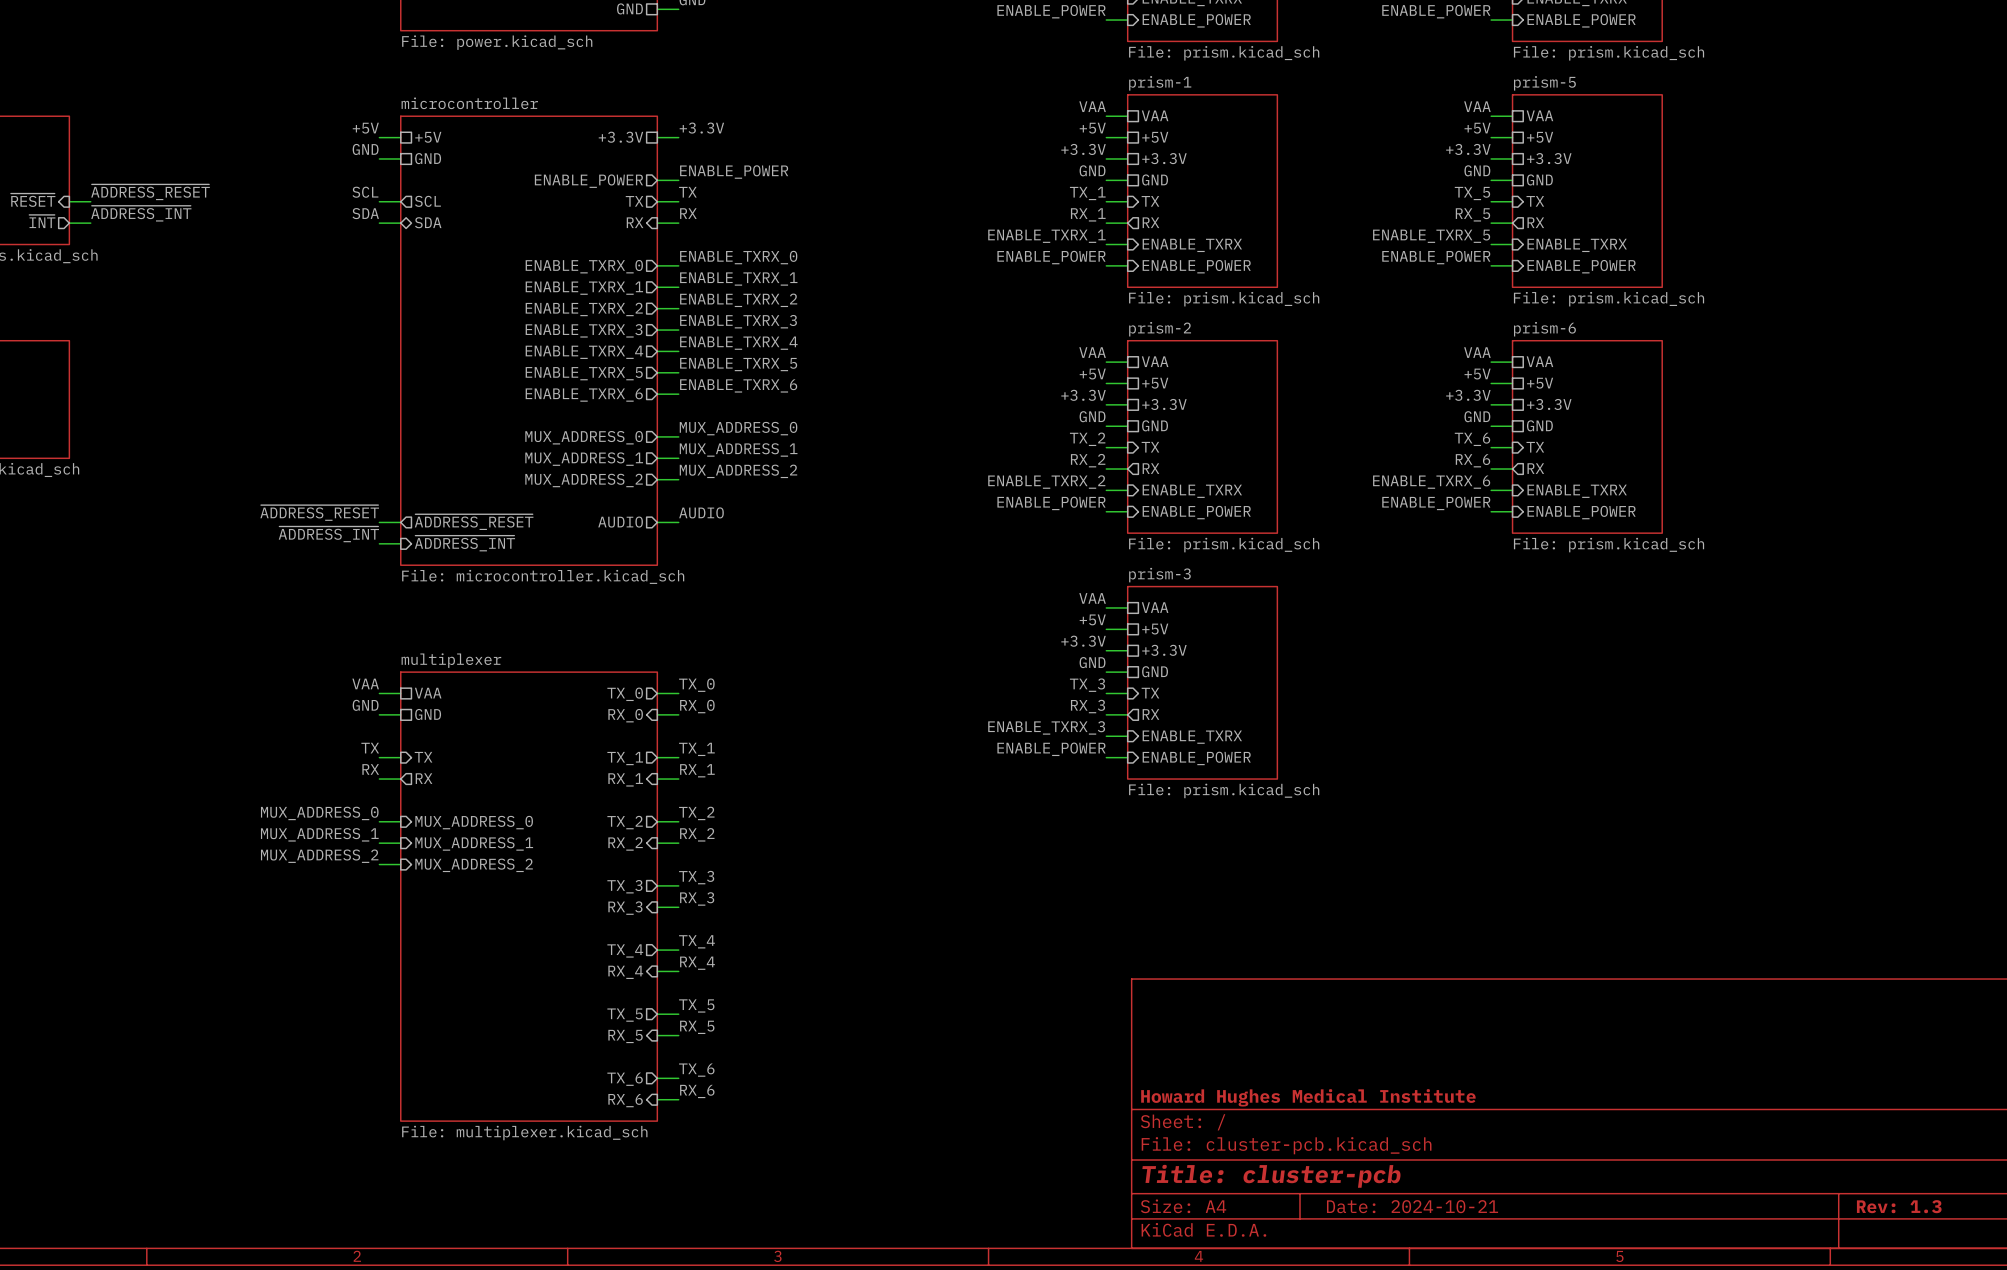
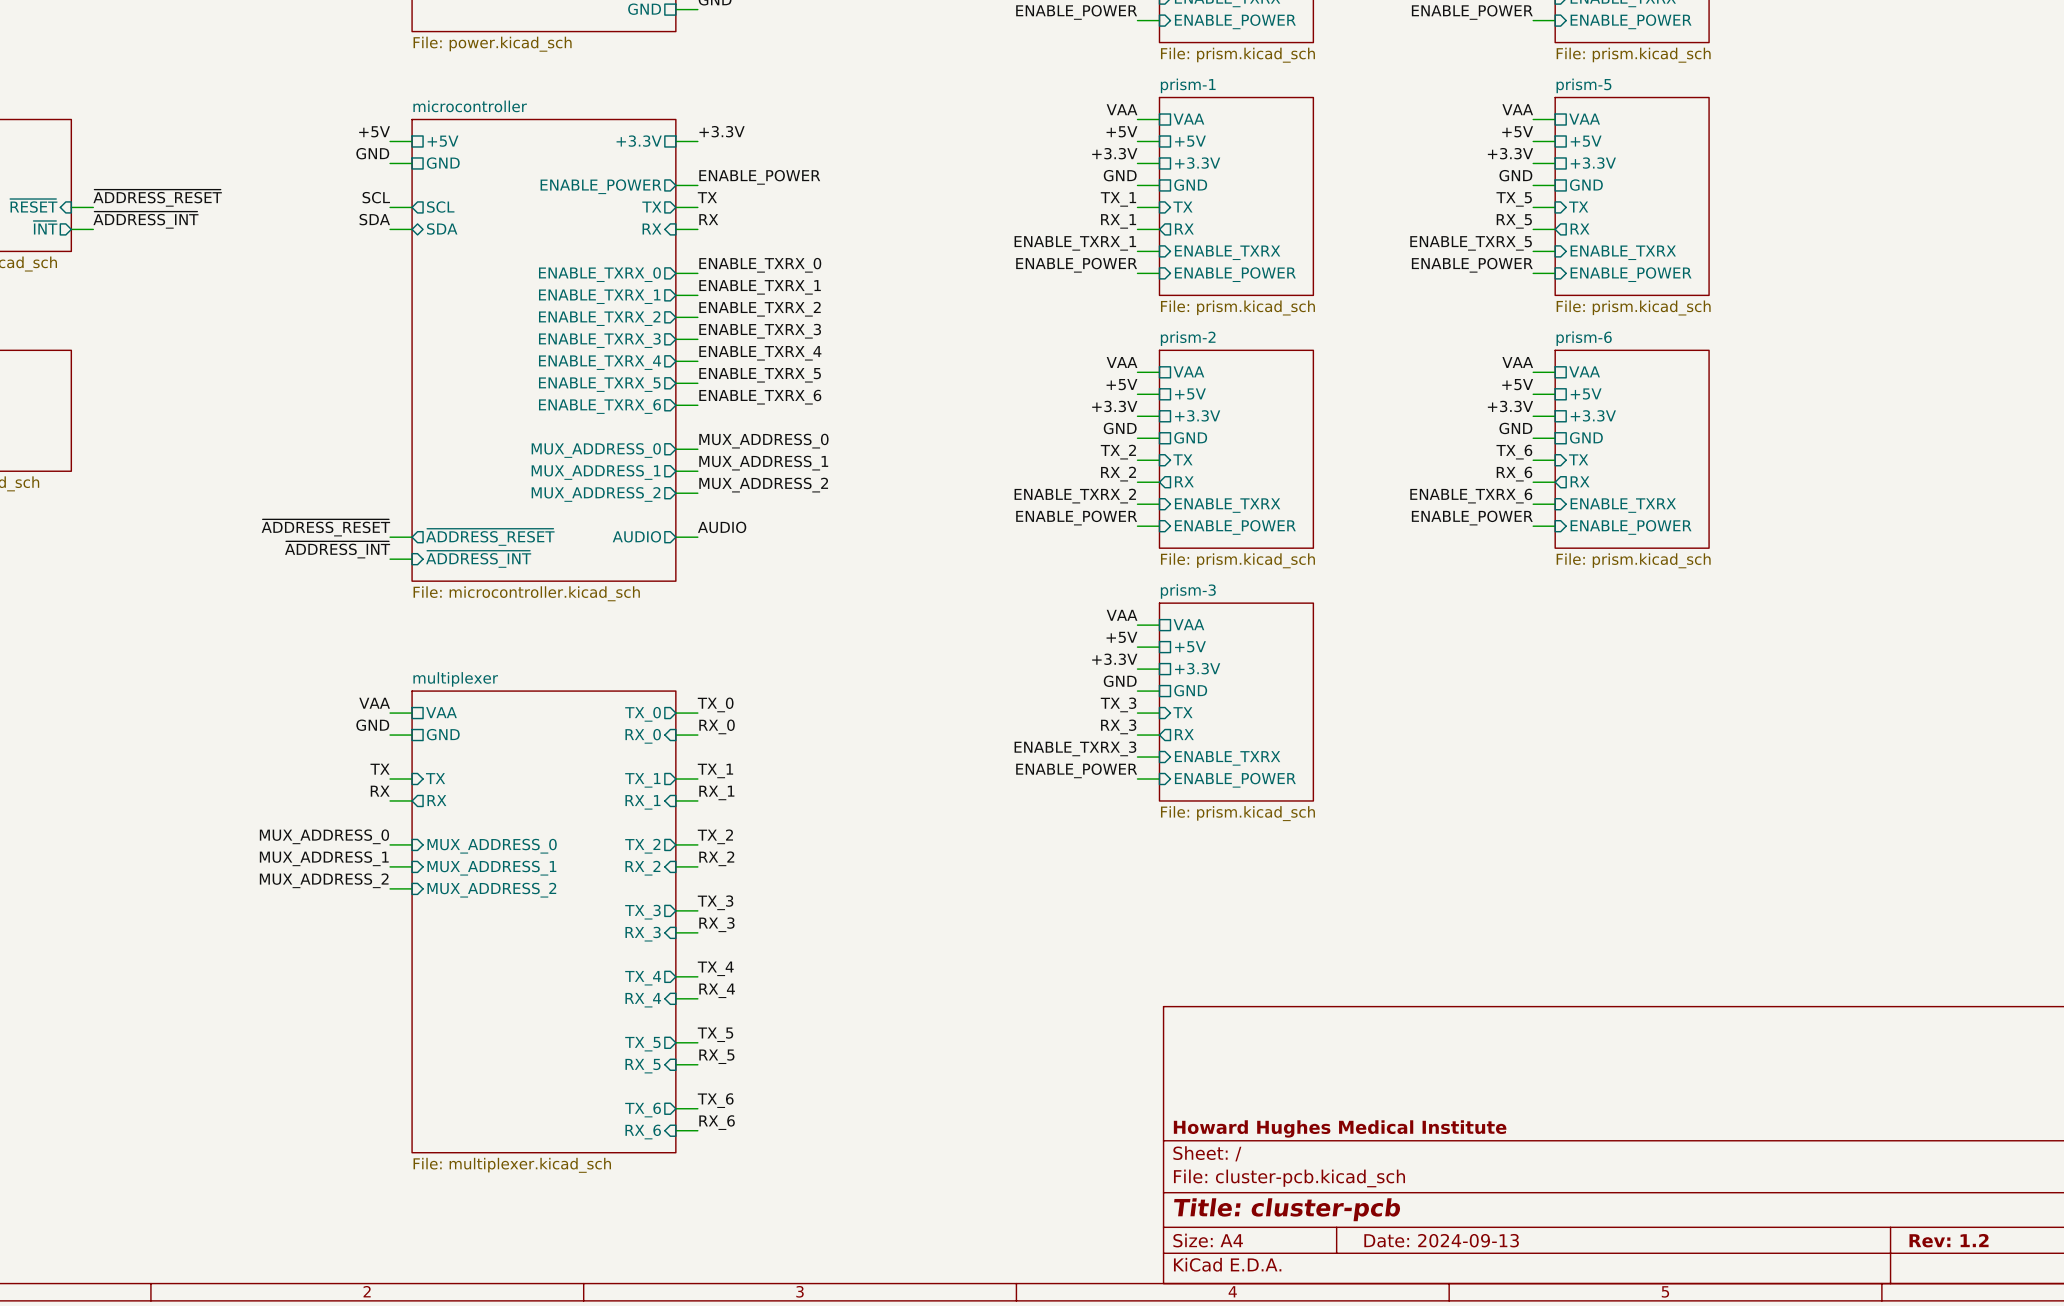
title block: Date: 2024-10-21 (1412, 1206) -> Date: 2024-09-13 (1441, 1240)
title block: Rev: 1.3 (1899, 1206) -> Rev: 1.2 (1949, 1240)

